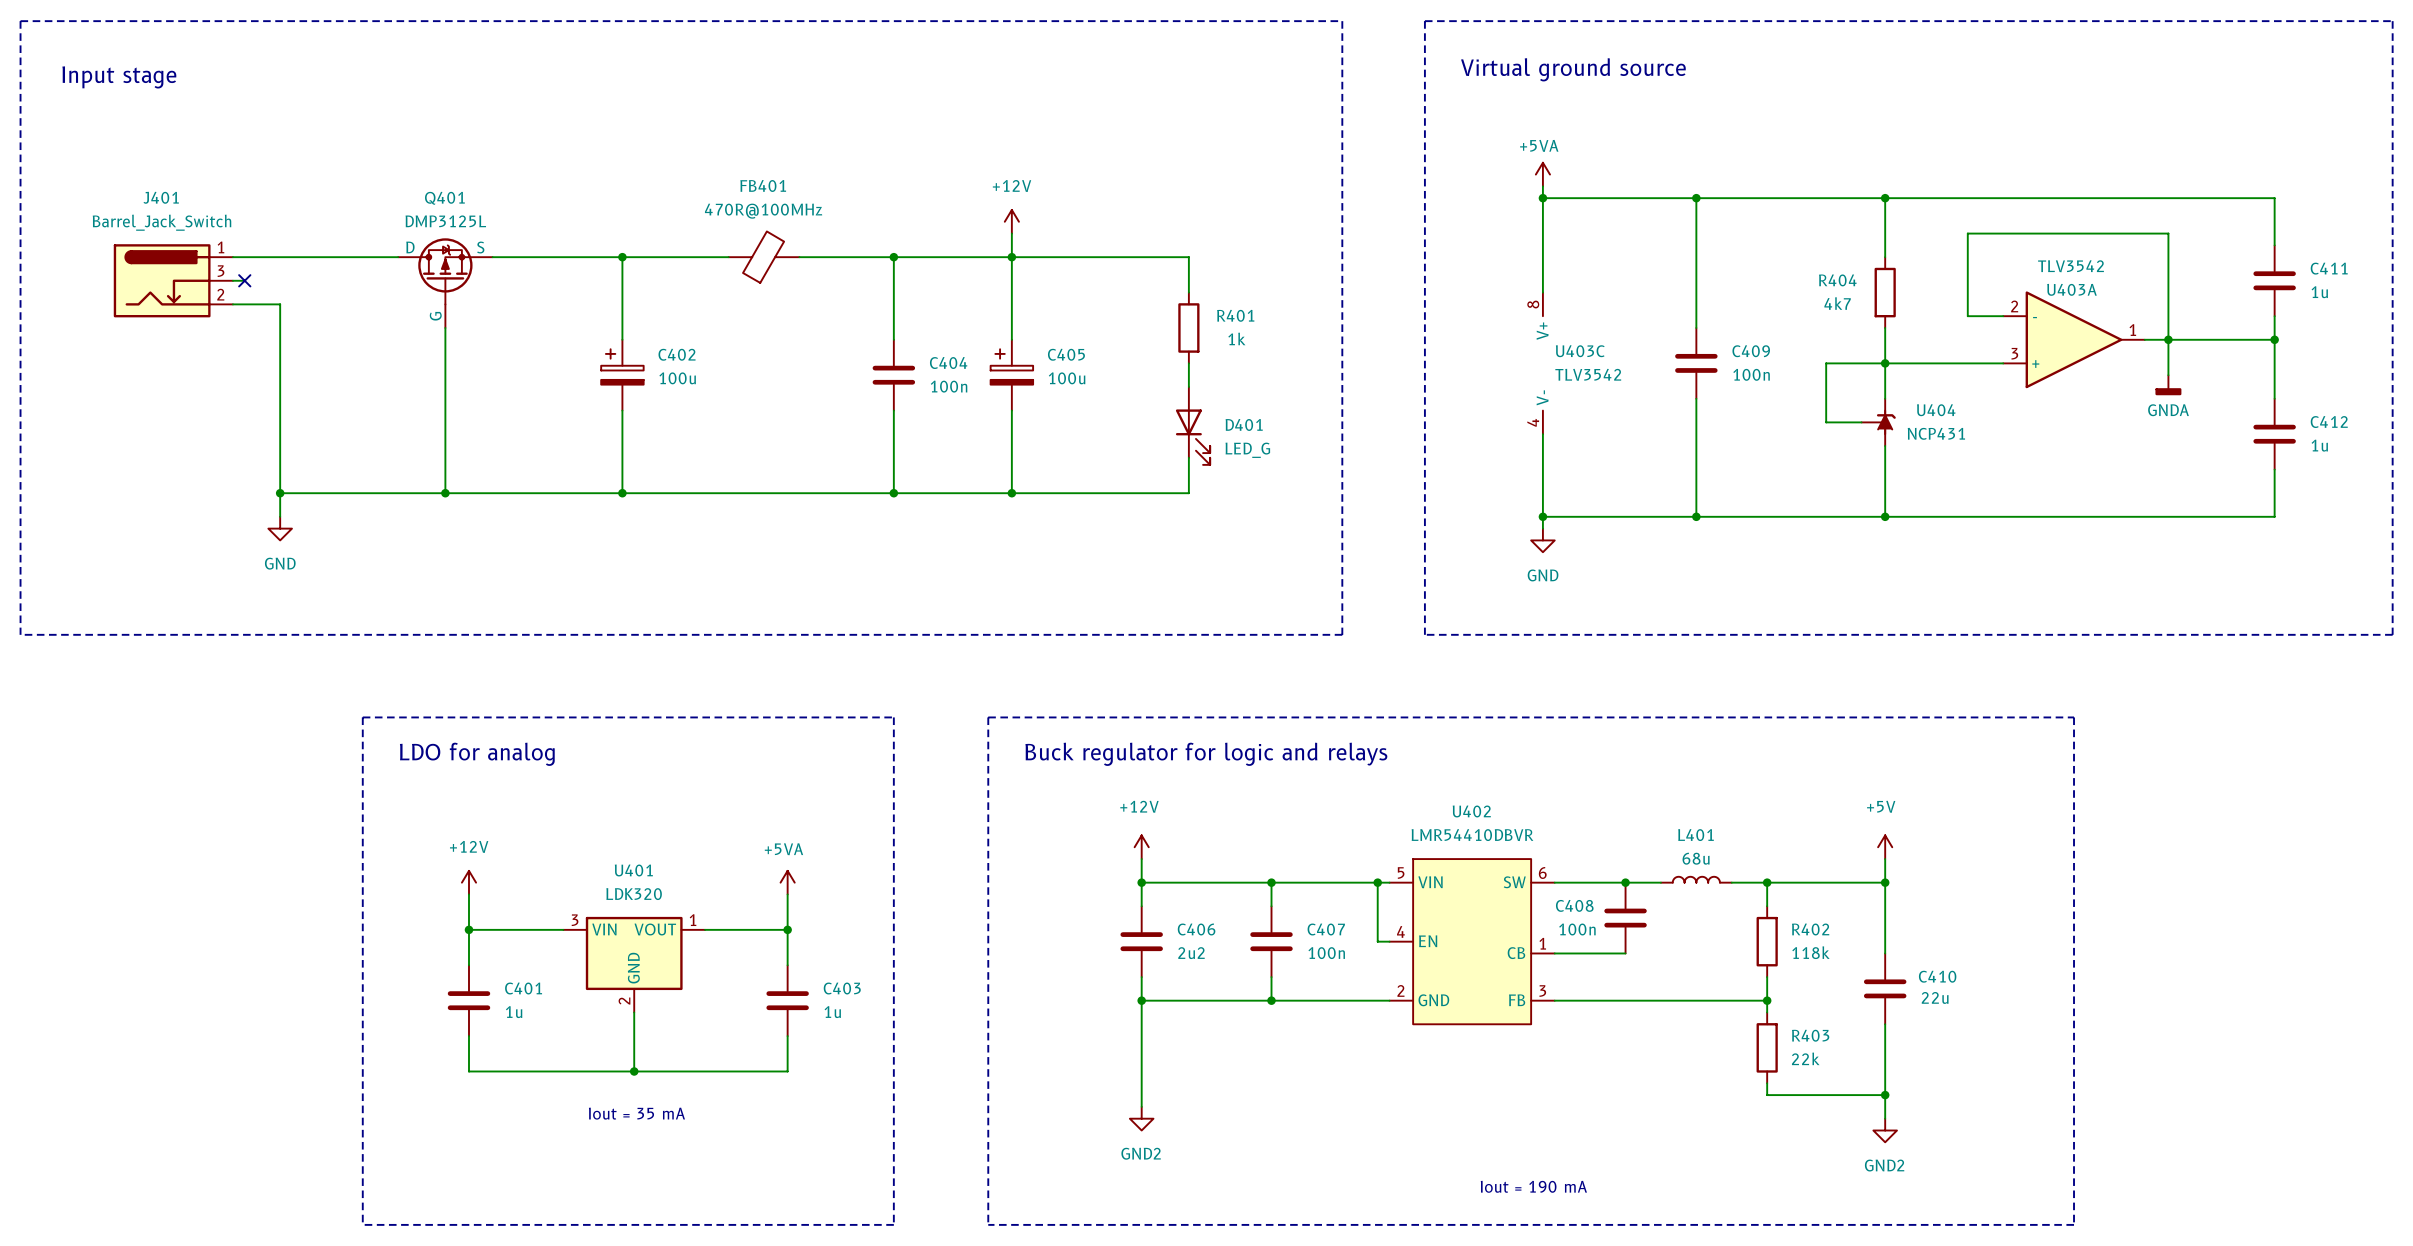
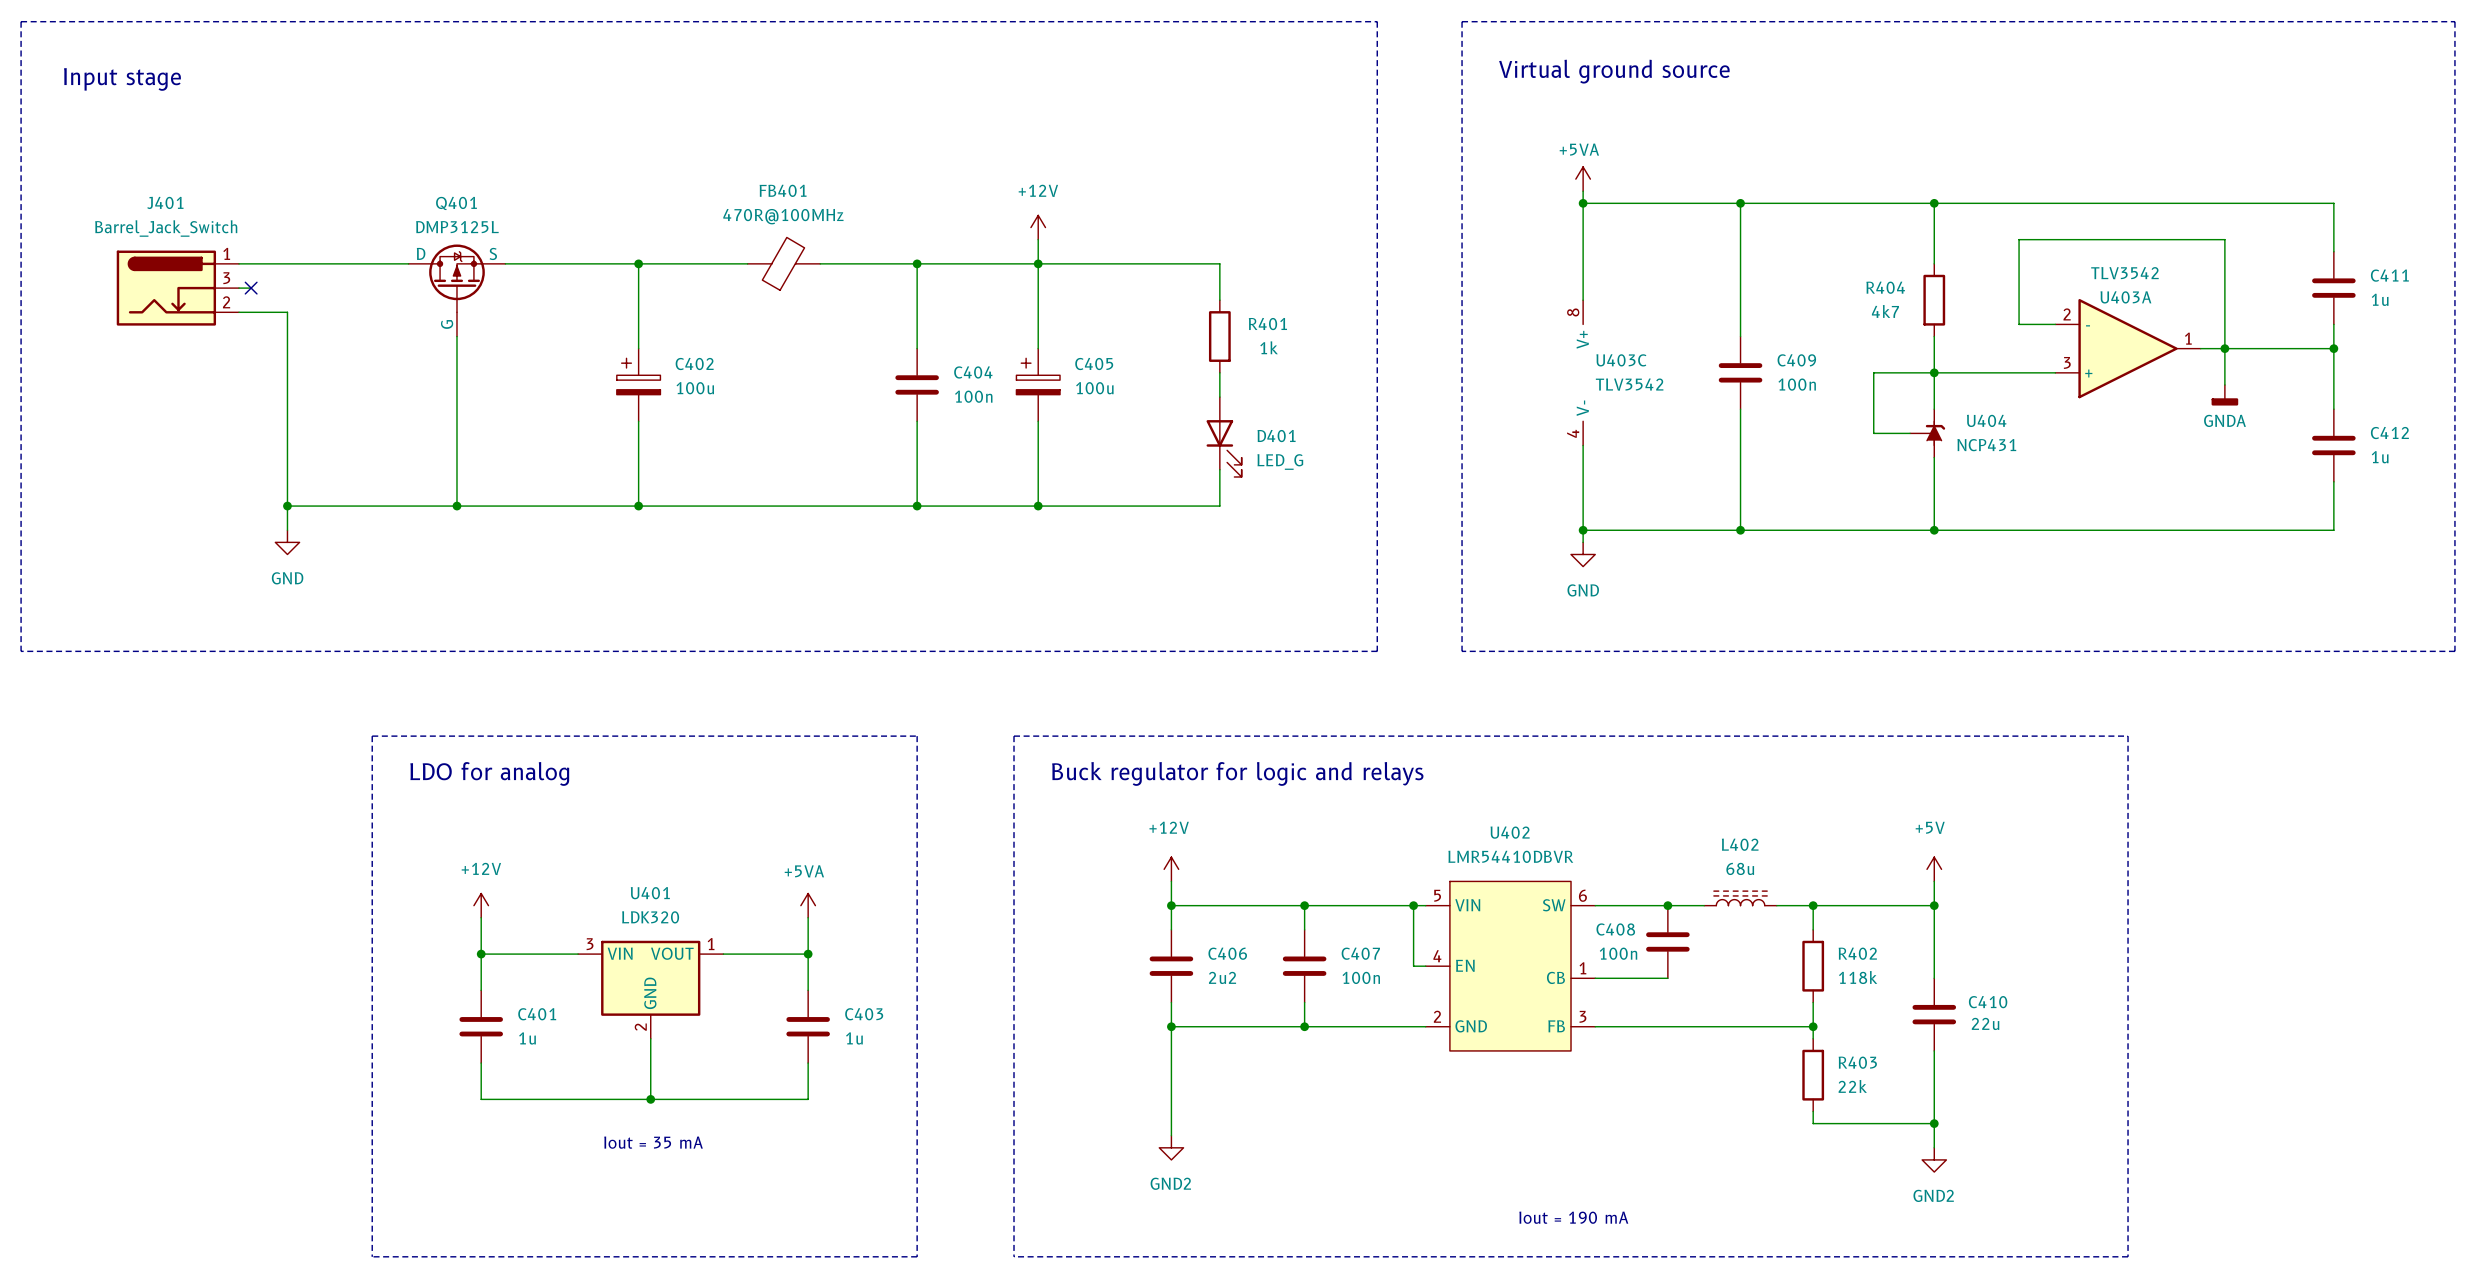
L402: none -> 68u (1740, 898)
L401: 68u (1696, 879) -> none

